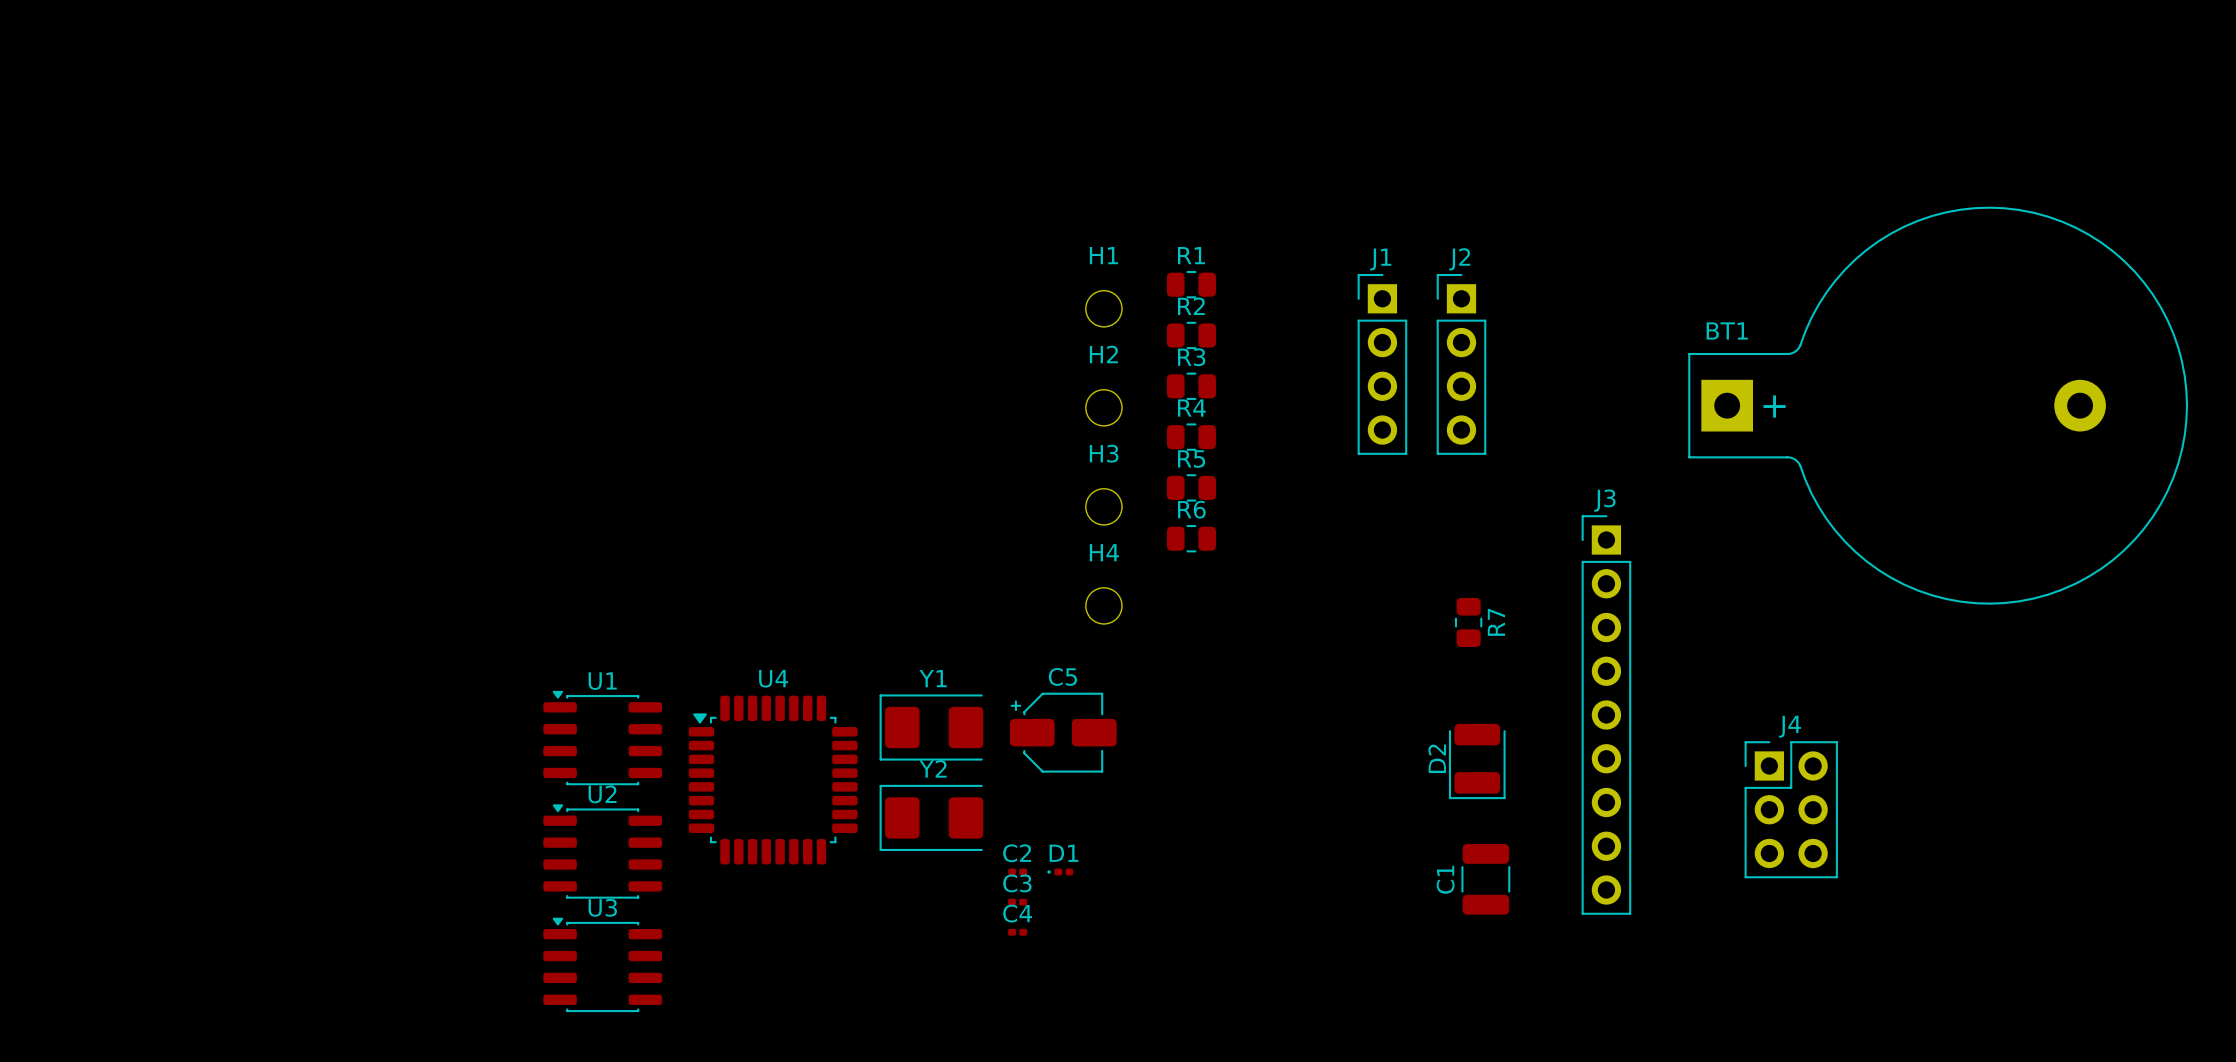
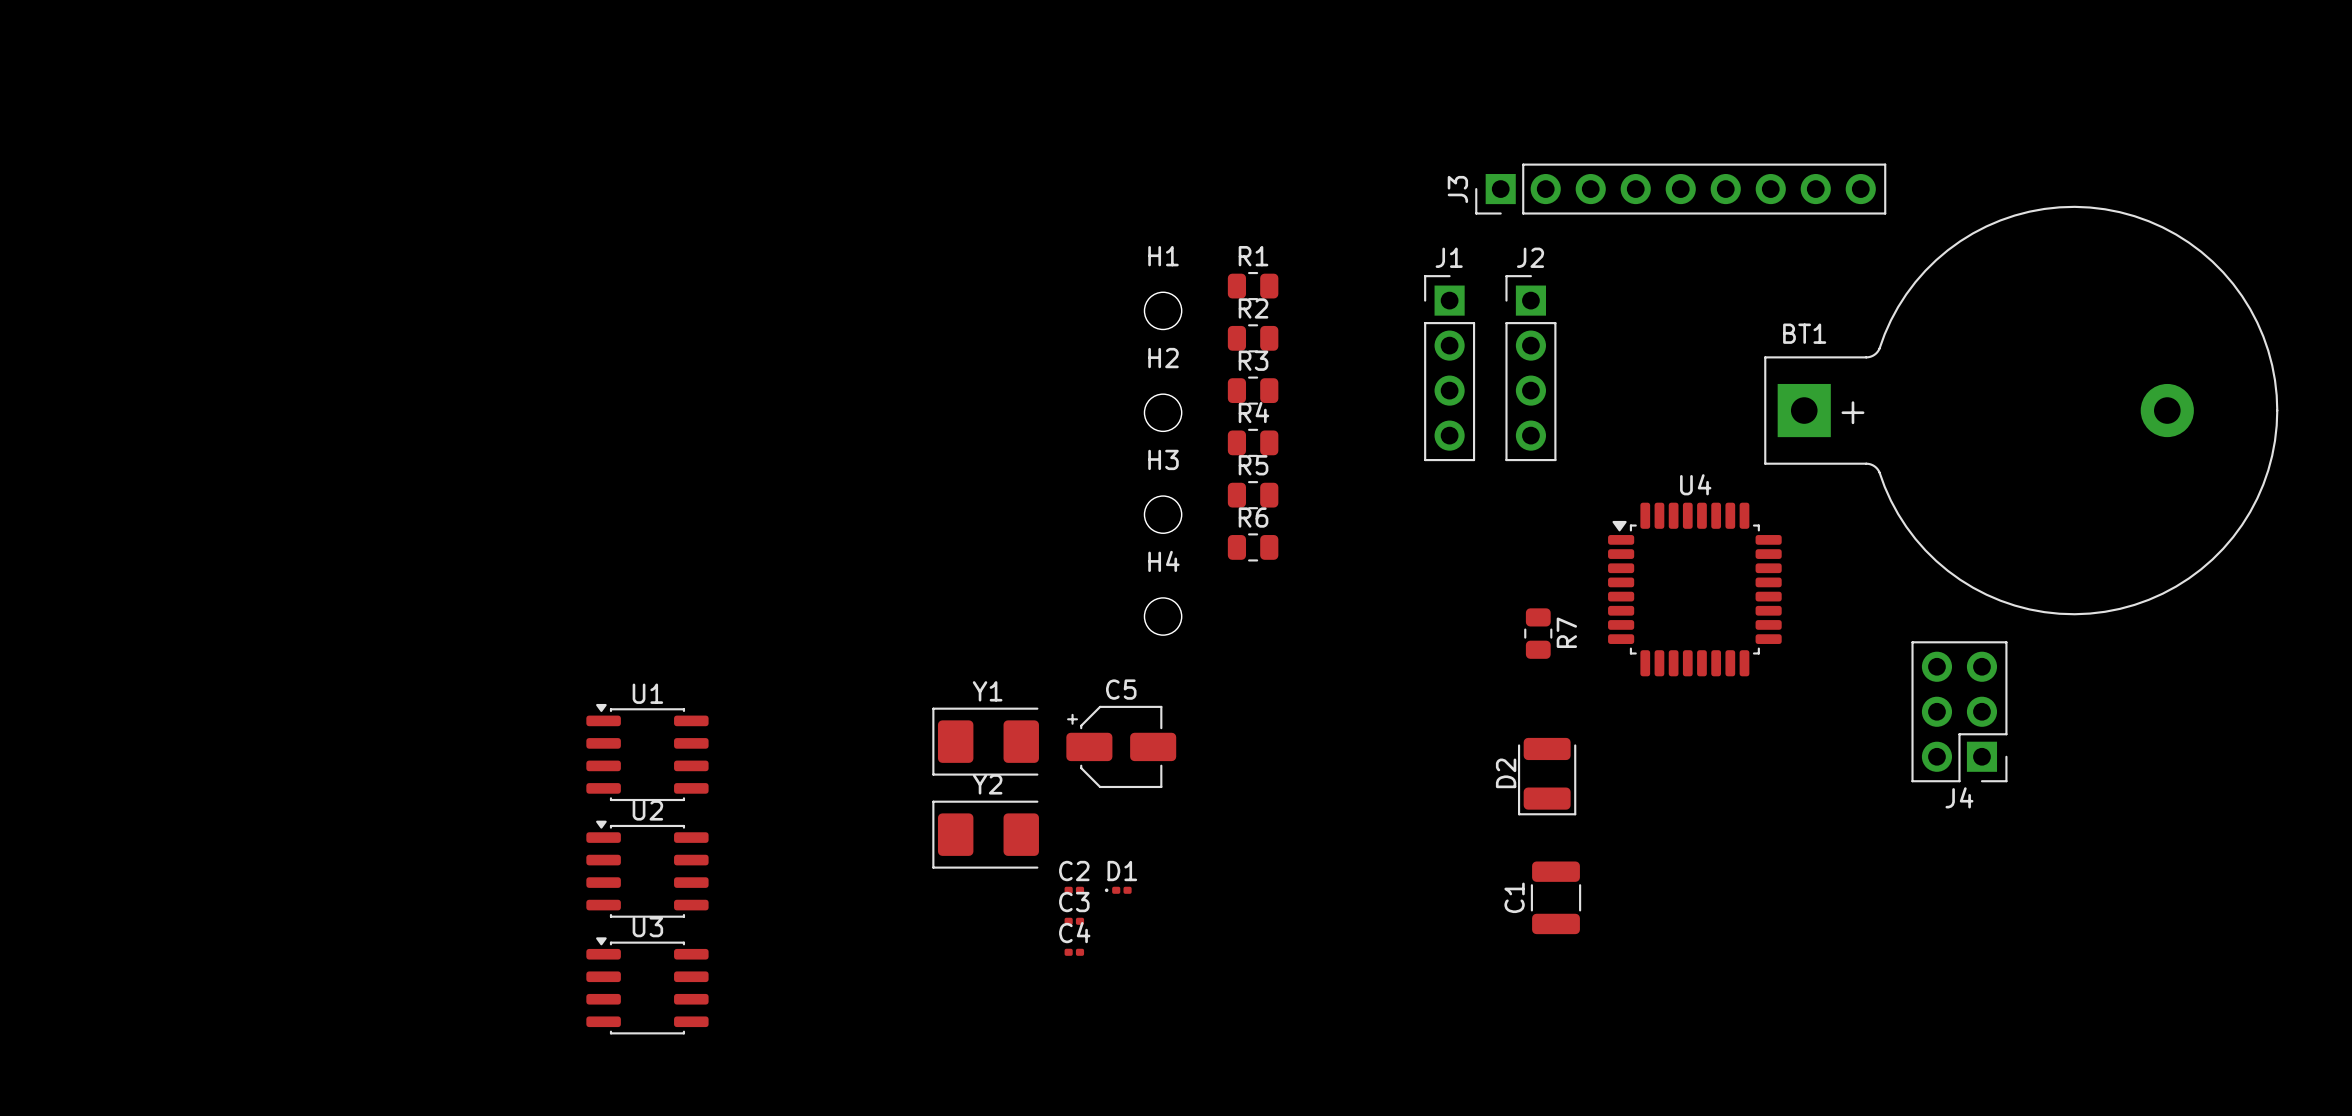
J3 rotation: 0° (1606, 715) -> 90° counterclockwise (1680, 189)
J3 position: (1606, 715) -> (1680, 189)
U4 position: (773, 780) -> (1694, 589)
J4 rotation: 0° (1791, 809) -> 180° (1959, 711)
J4 position: (1791, 809) -> (1959, 711)

